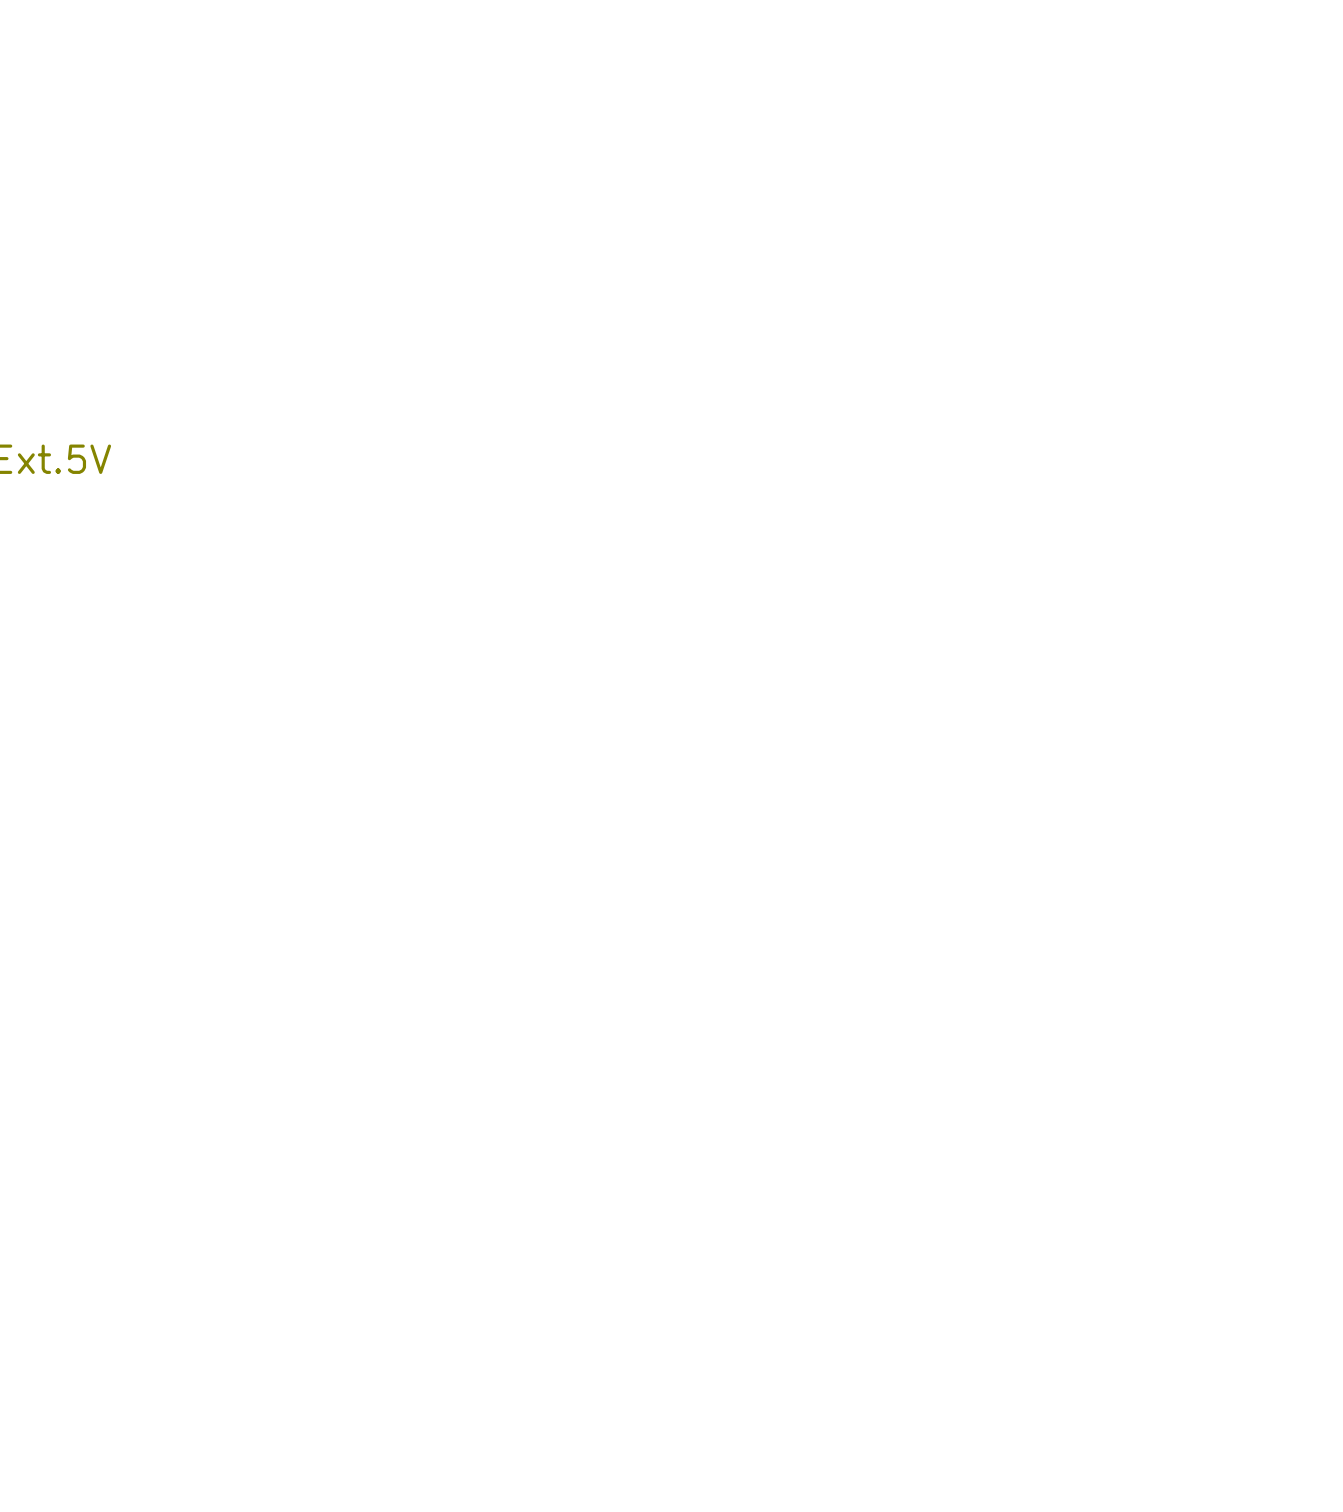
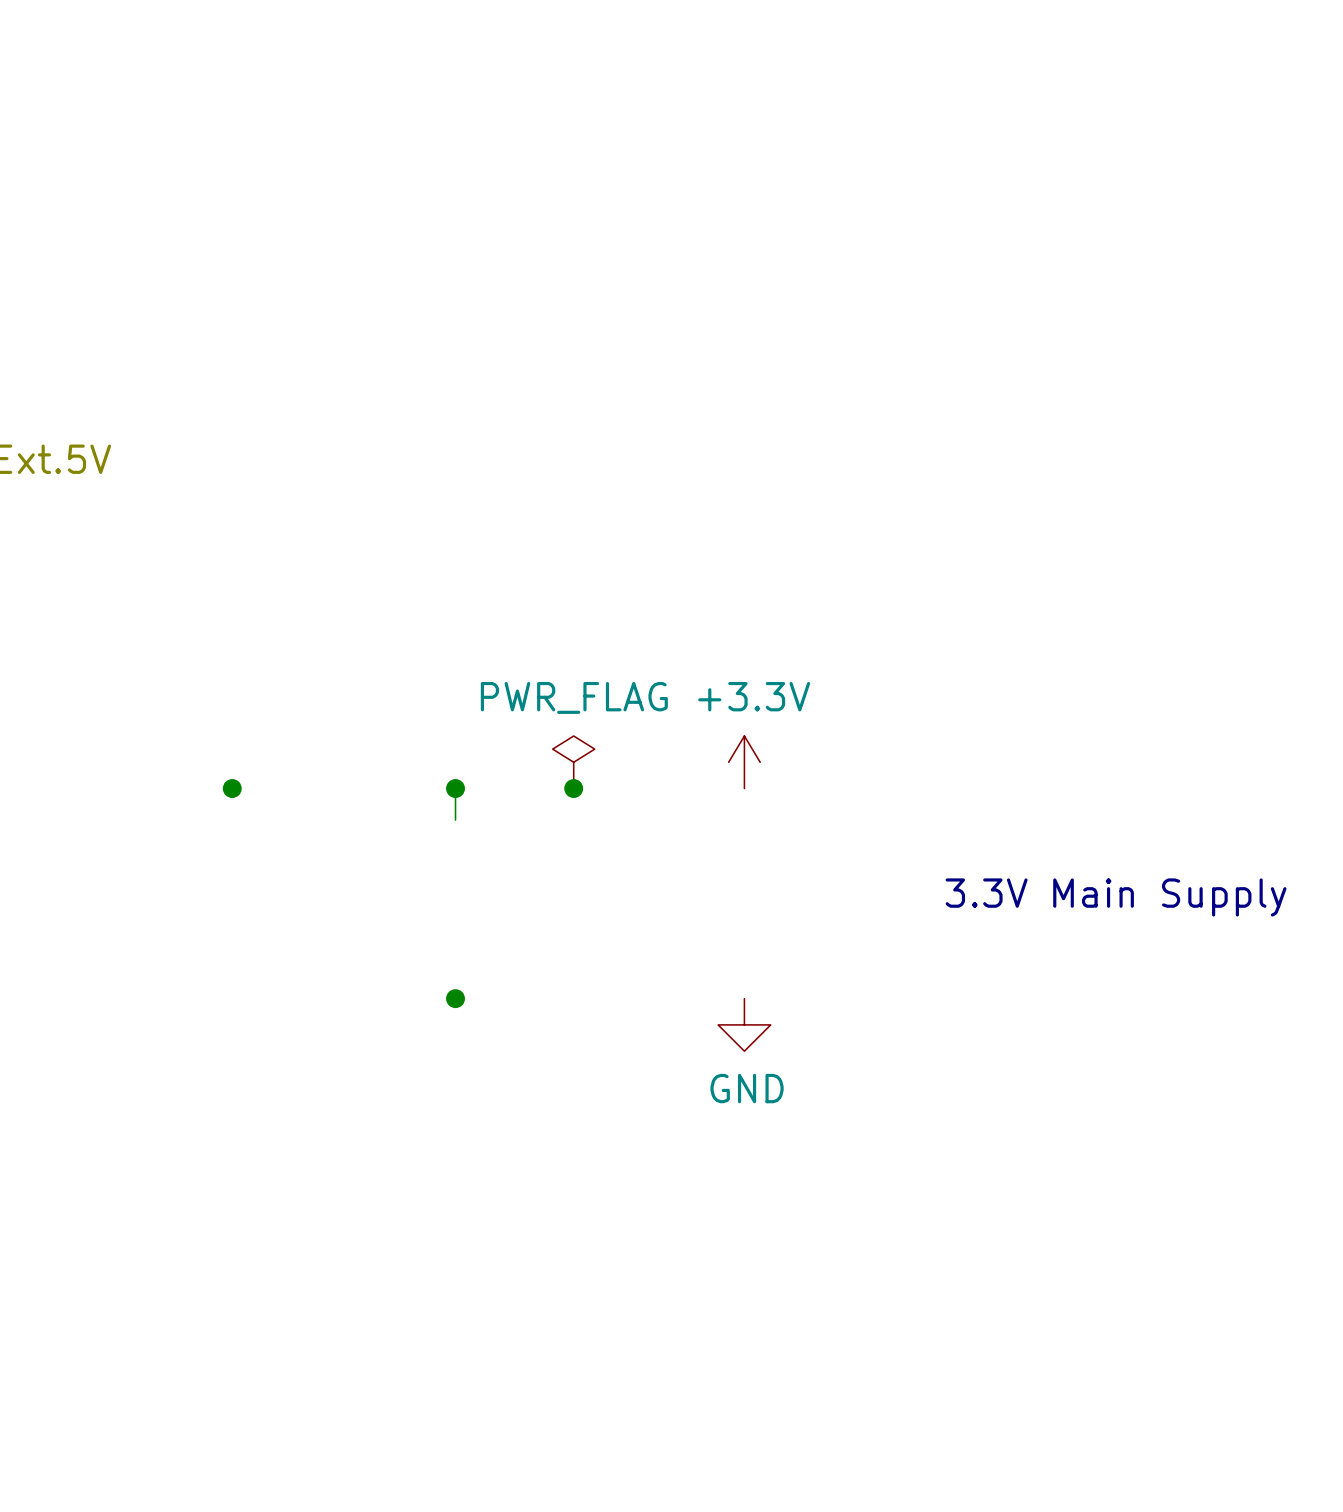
power symbol: none -> PWR_FLAG (573, 762)
power symbol: none -> +3.3V (744, 762)
junction: none -> (232, 788)
wire: none -> (455, 788) (455, 820)
junction: none -> (455, 788)
junction: none -> (573, 788)
text: none -> 3.3V Main Supply (1116, 897)
junction: none -> (455, 998)
power symbol: none -> GND (744, 1024)

